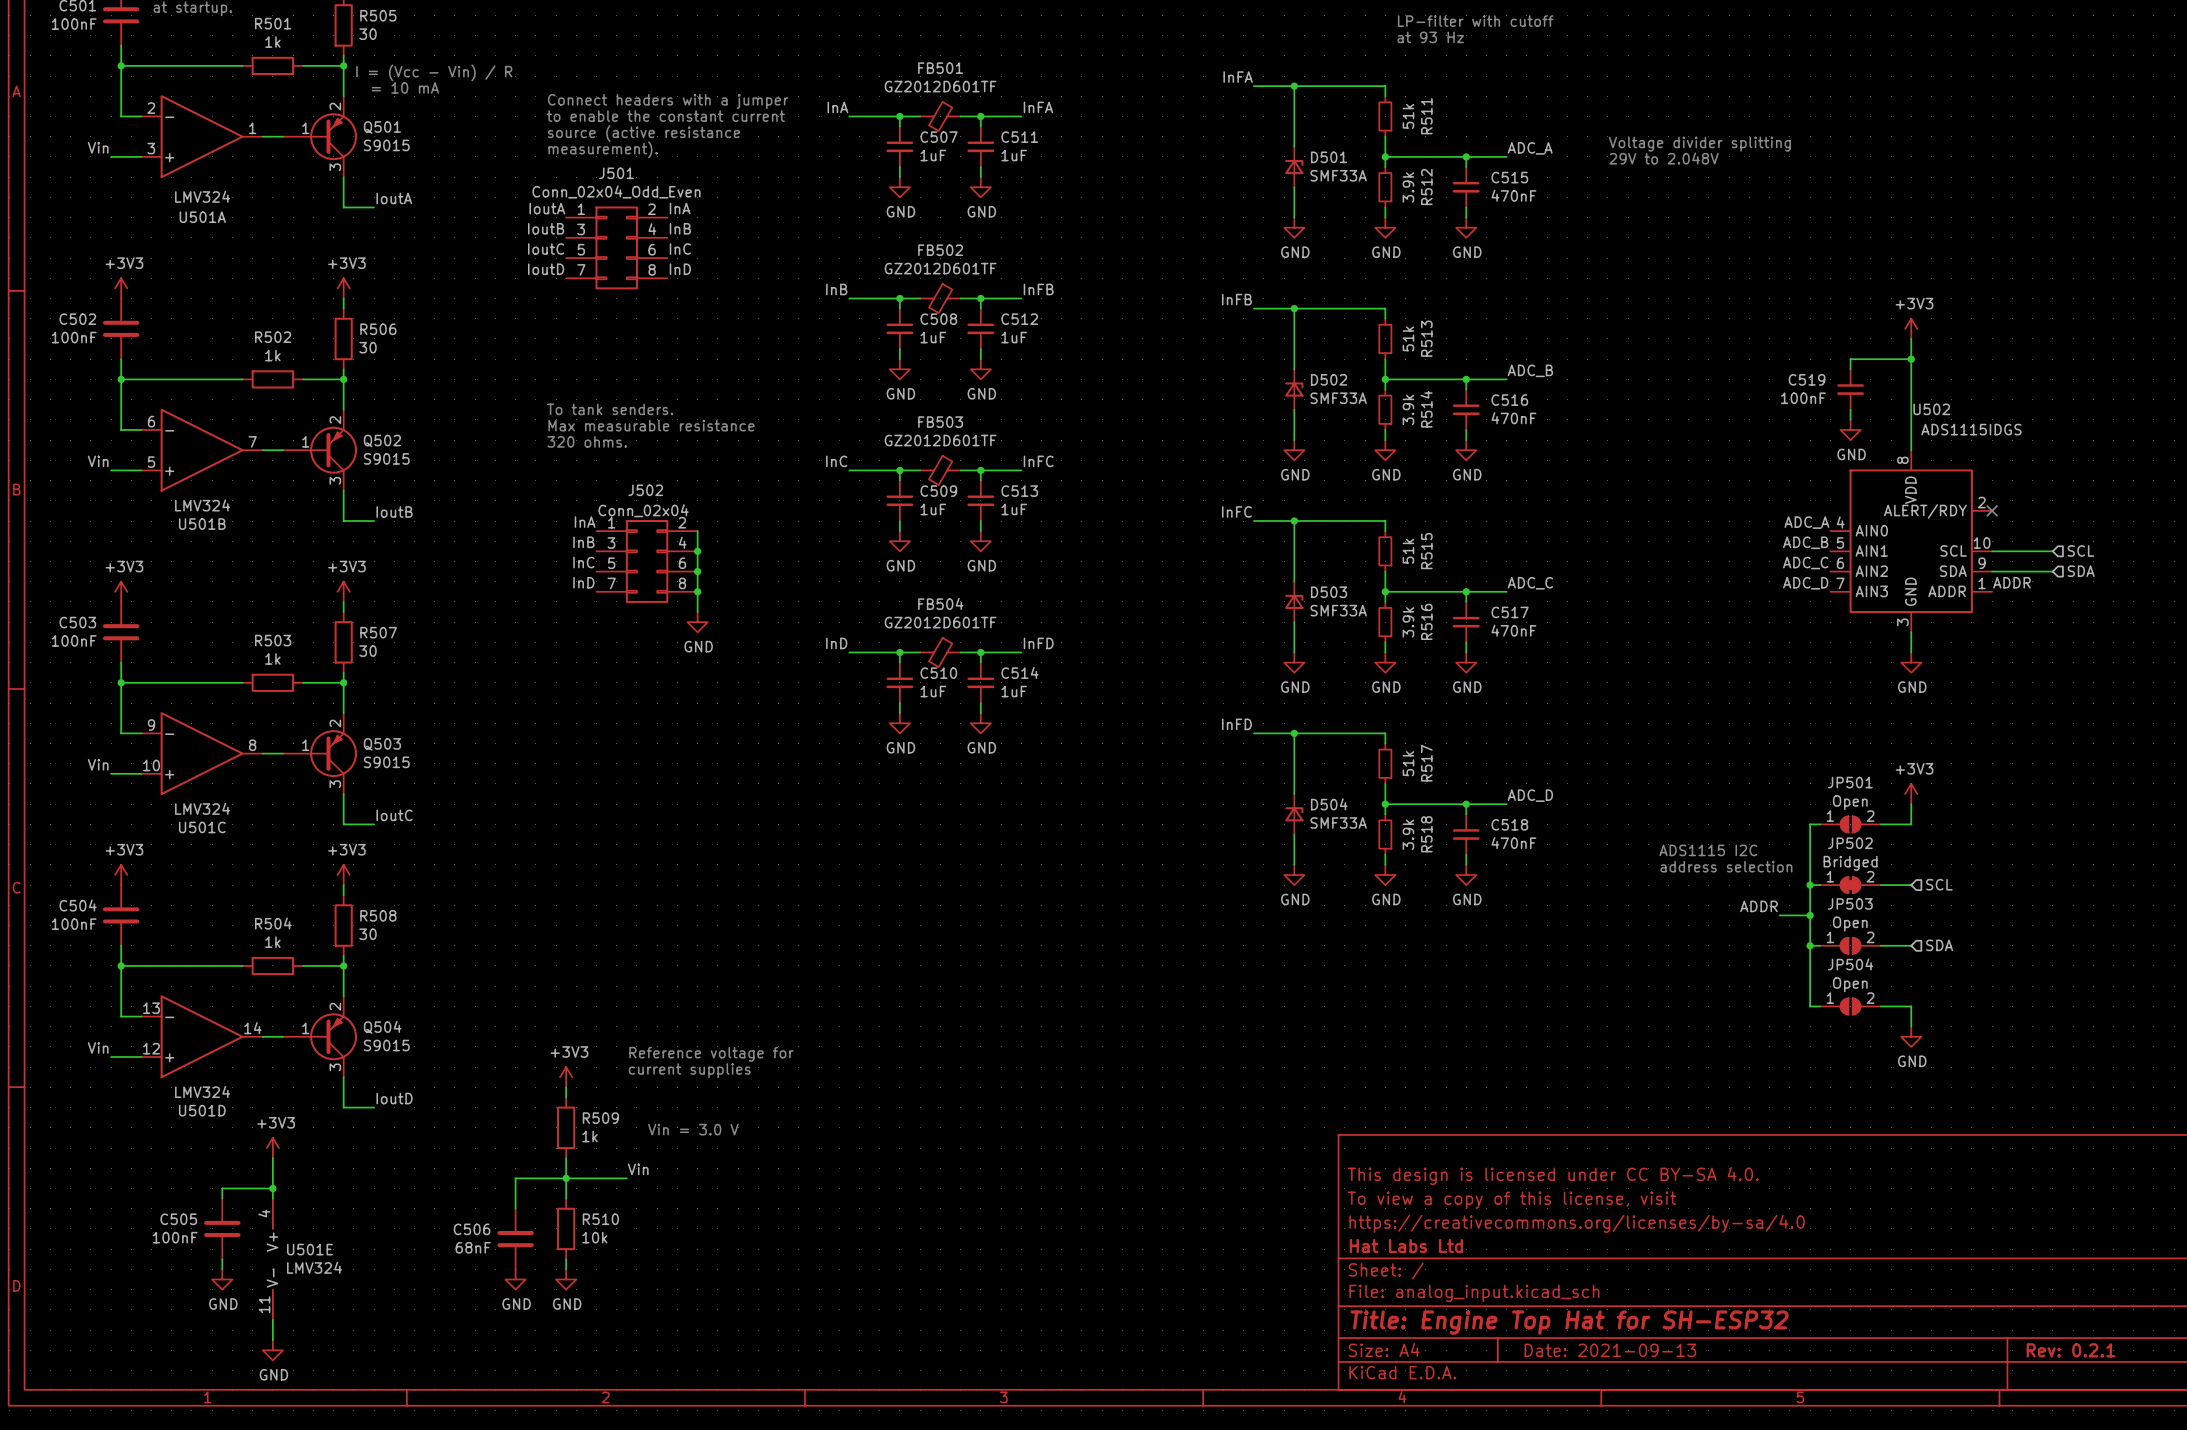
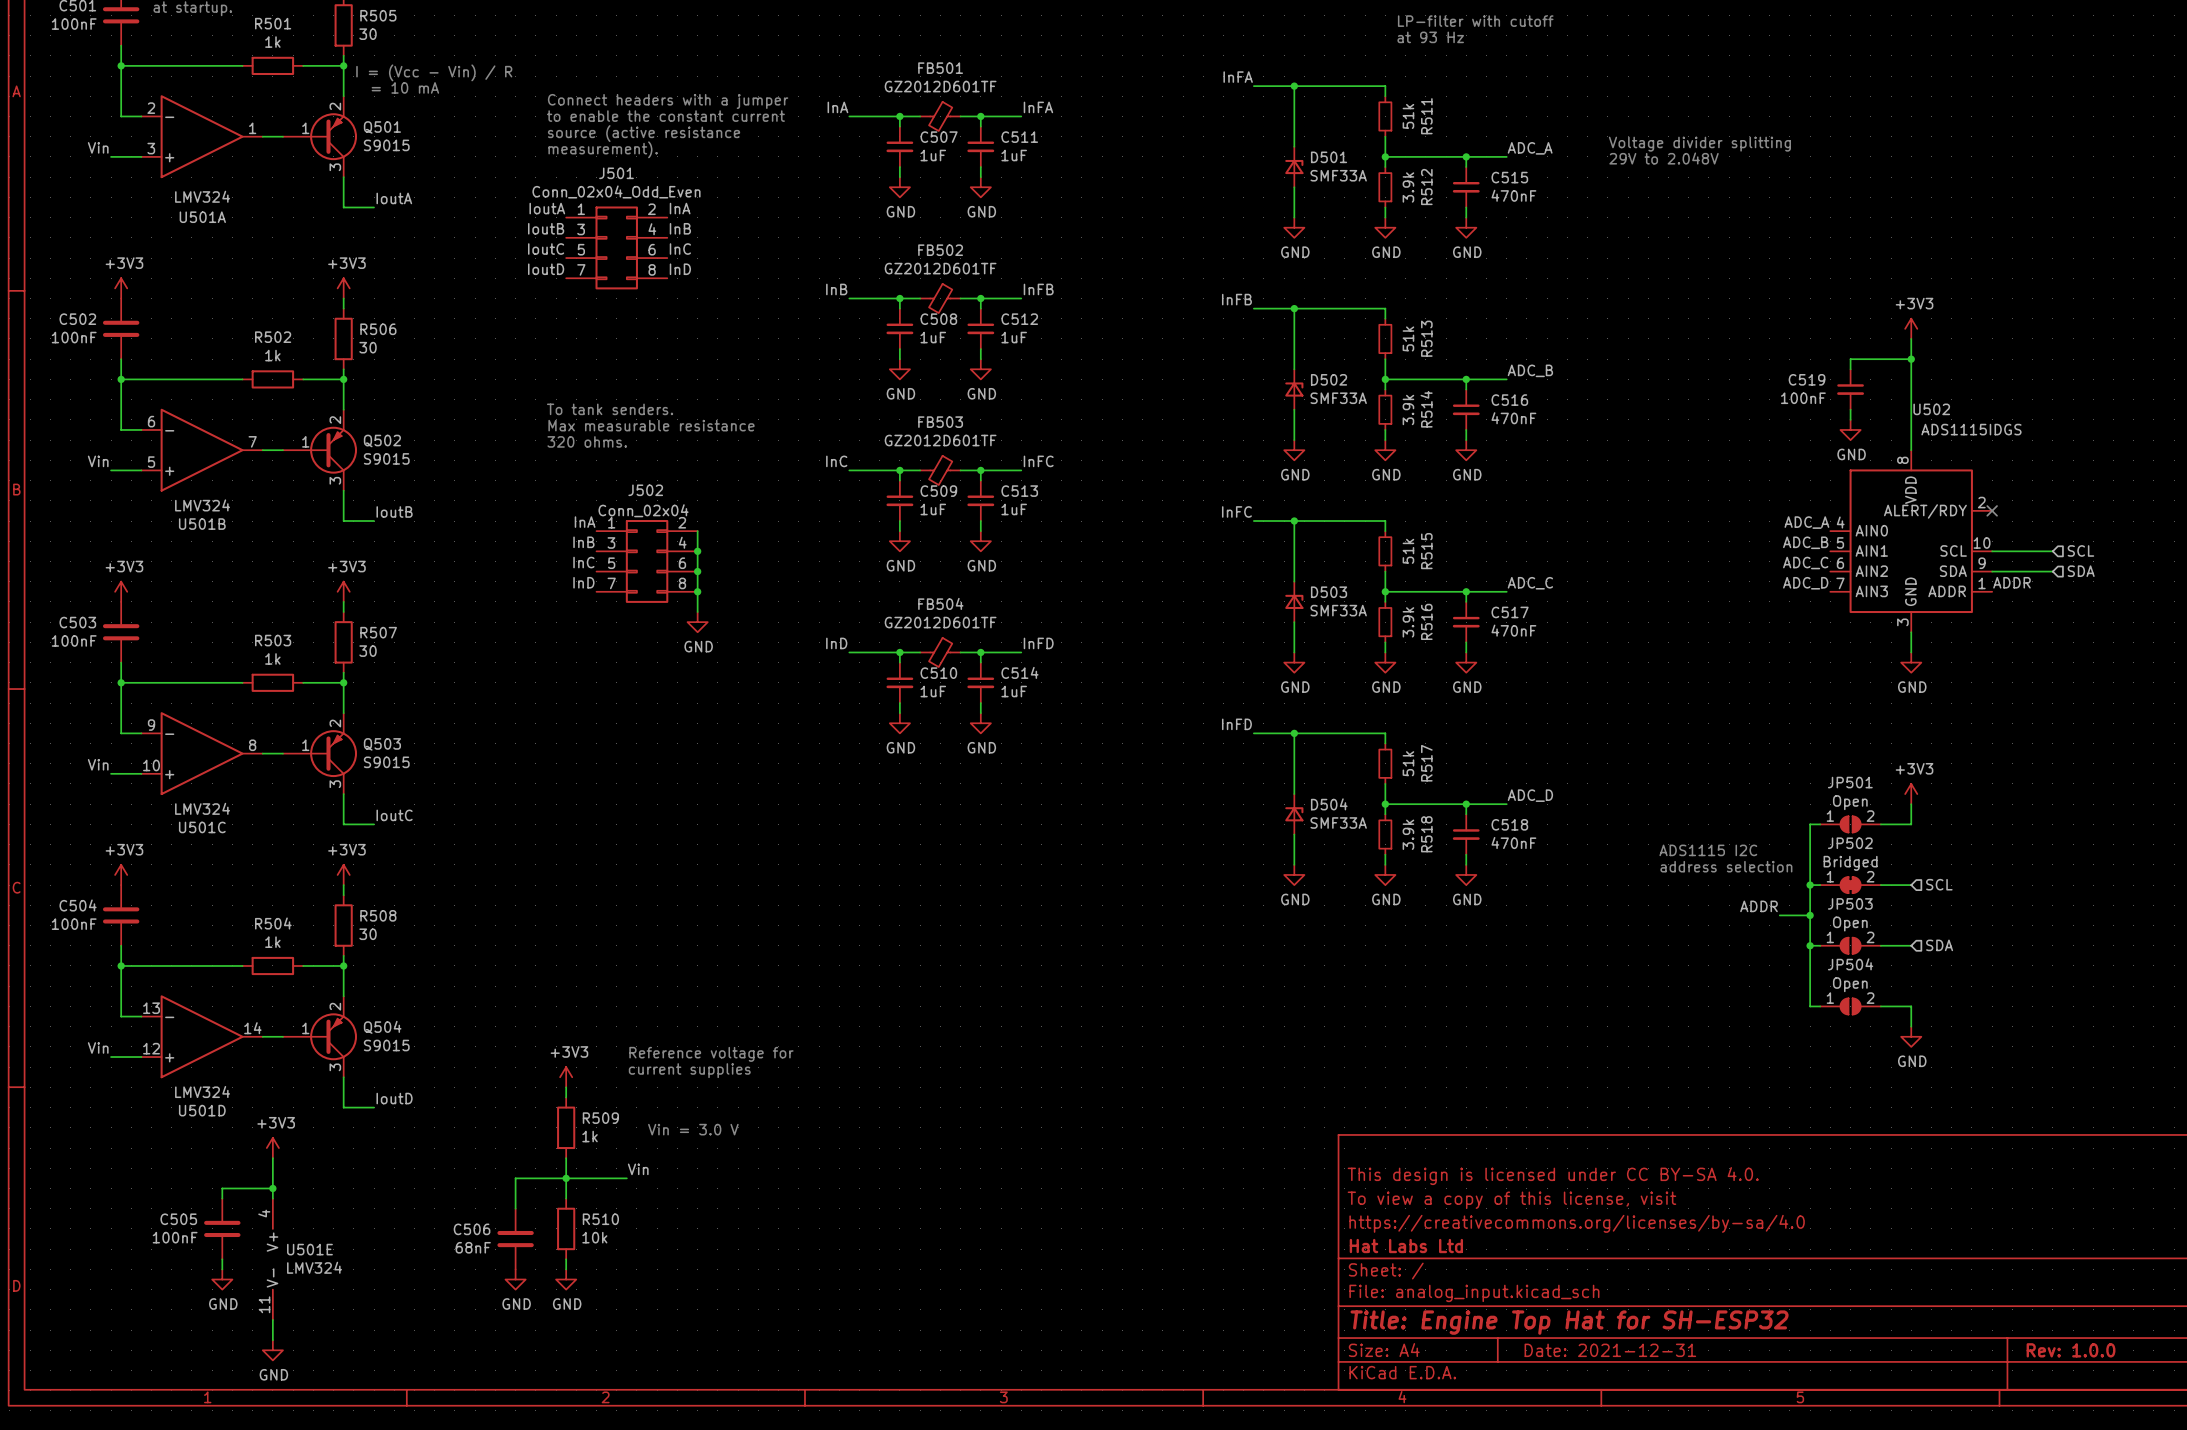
title block: Date: 2021-09-13 (1610, 1350) -> Date: 2021-12-31 (1610, 1350)
title block: Rev: 0.2.1 (2071, 1350) -> Rev: 1.0.0 (2071, 1350)

